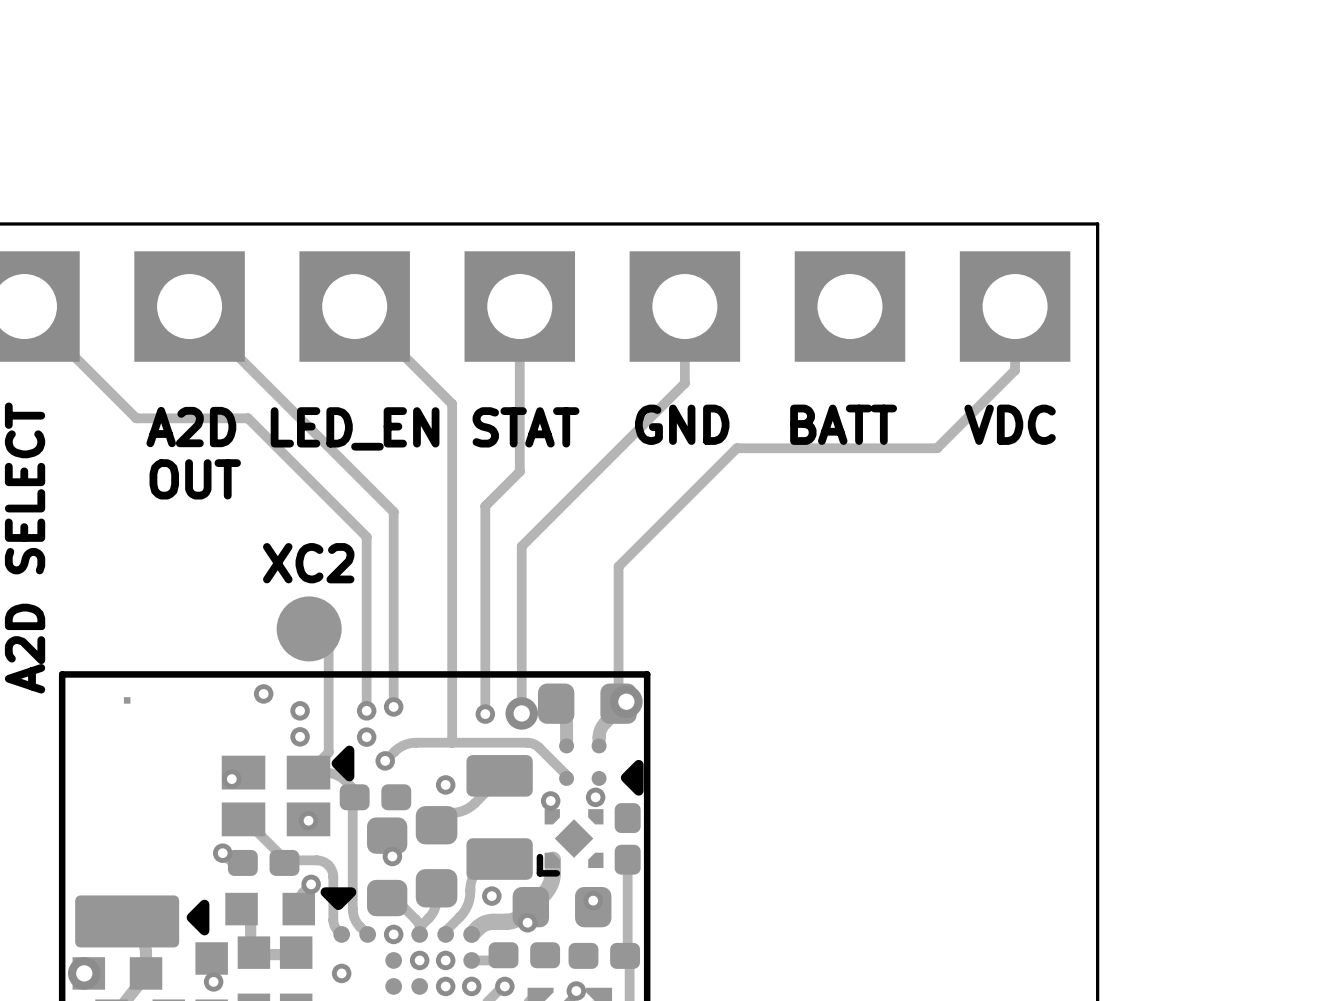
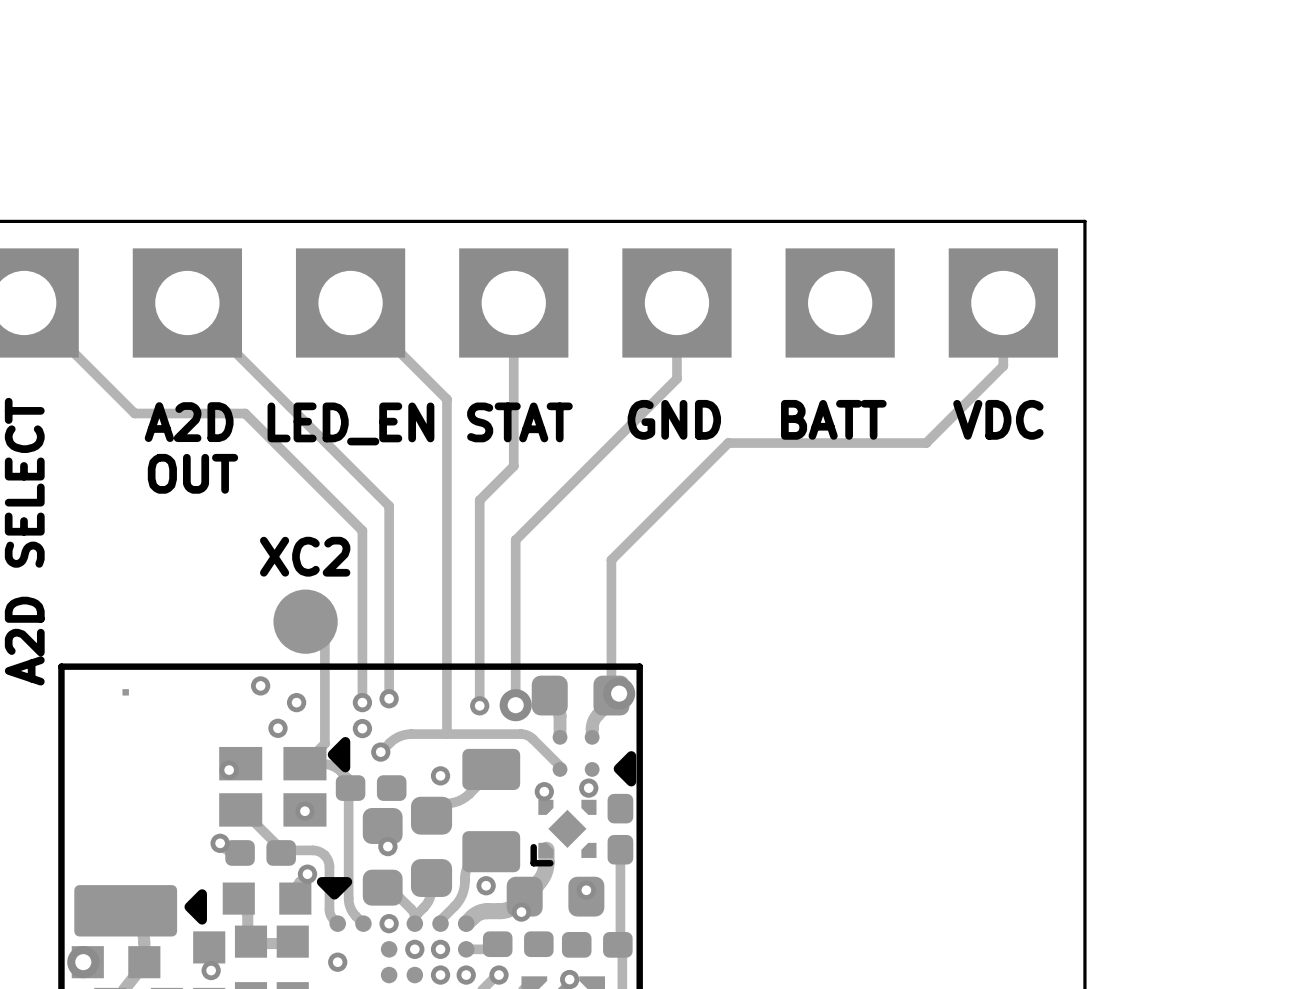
via position: (300, 736) -> (277, 728)
part footprint: [466, 755, 533, 880] -> [462, 748, 521, 873]

